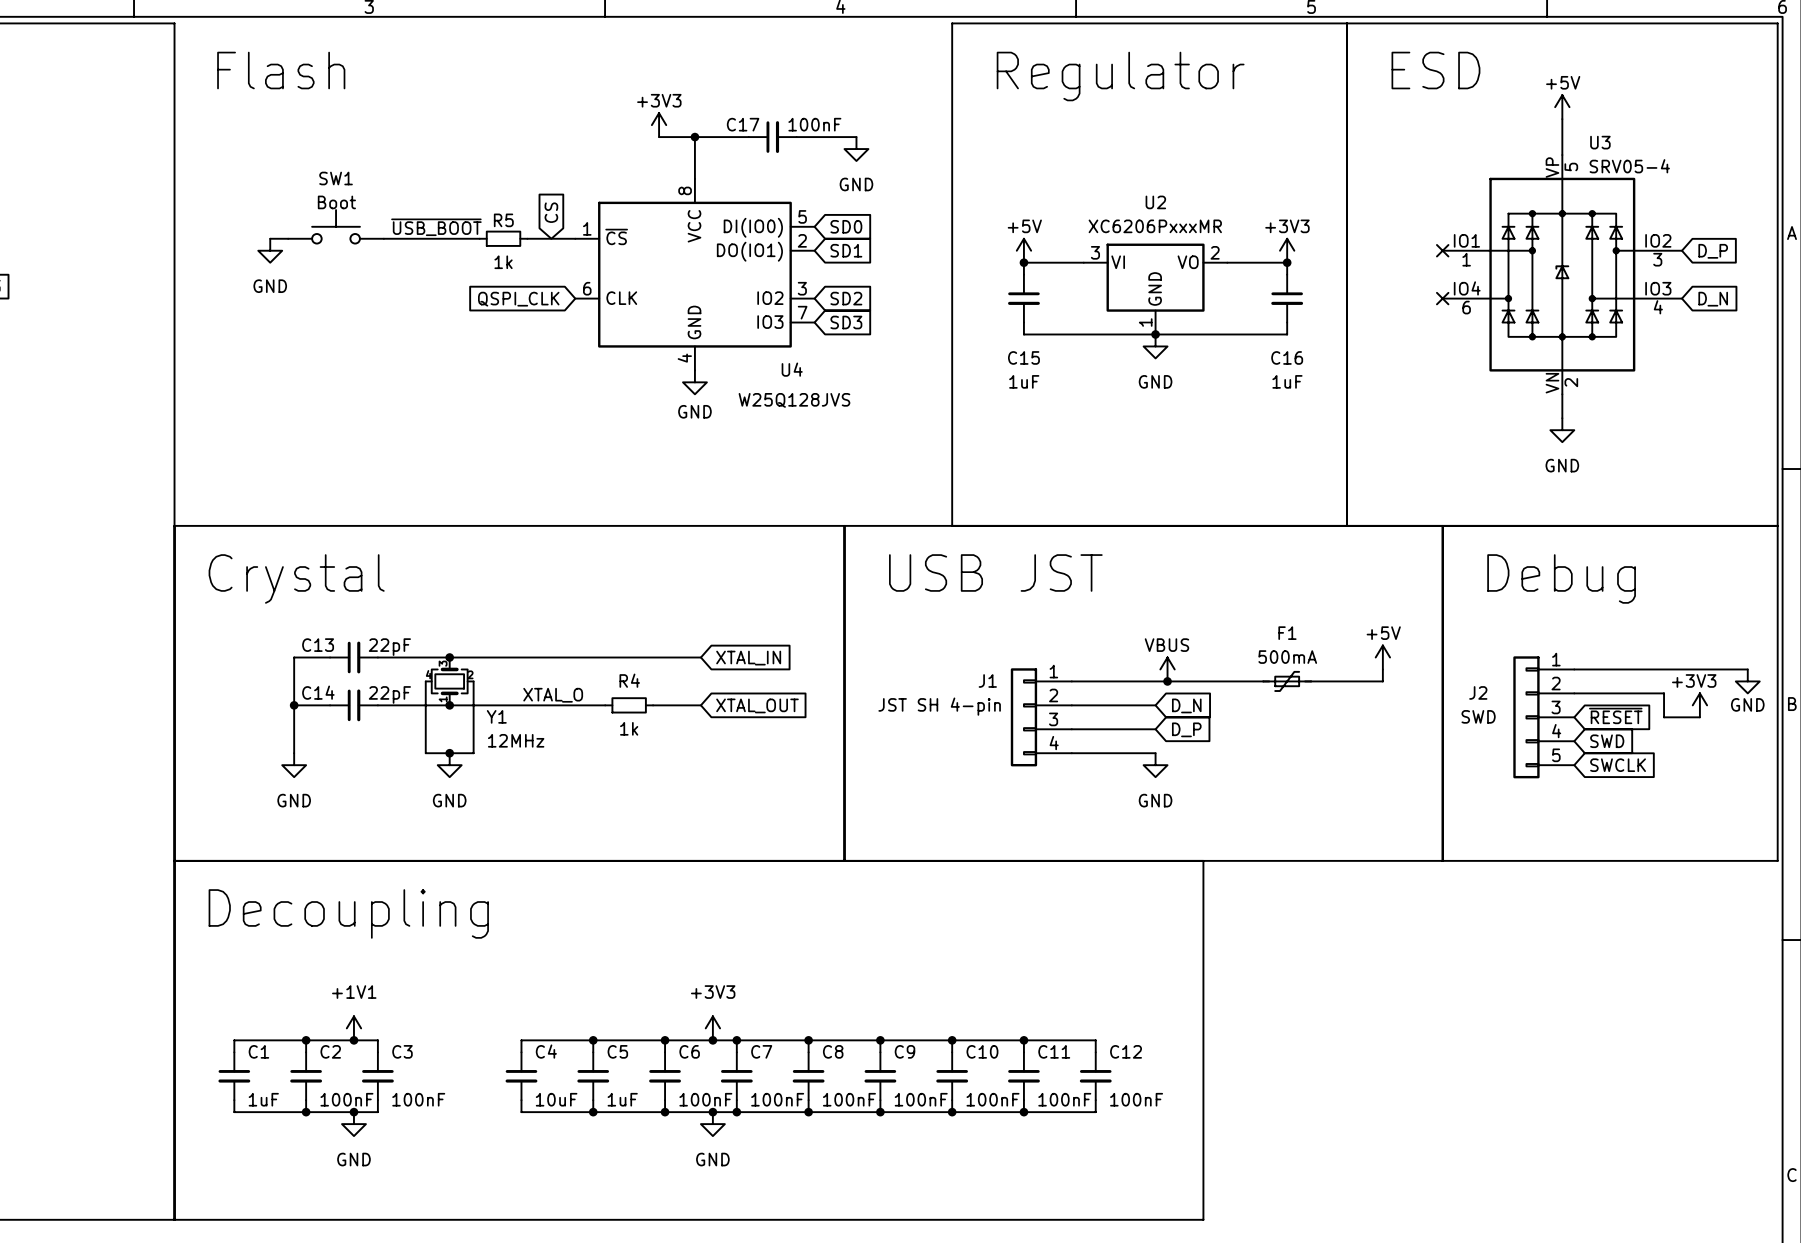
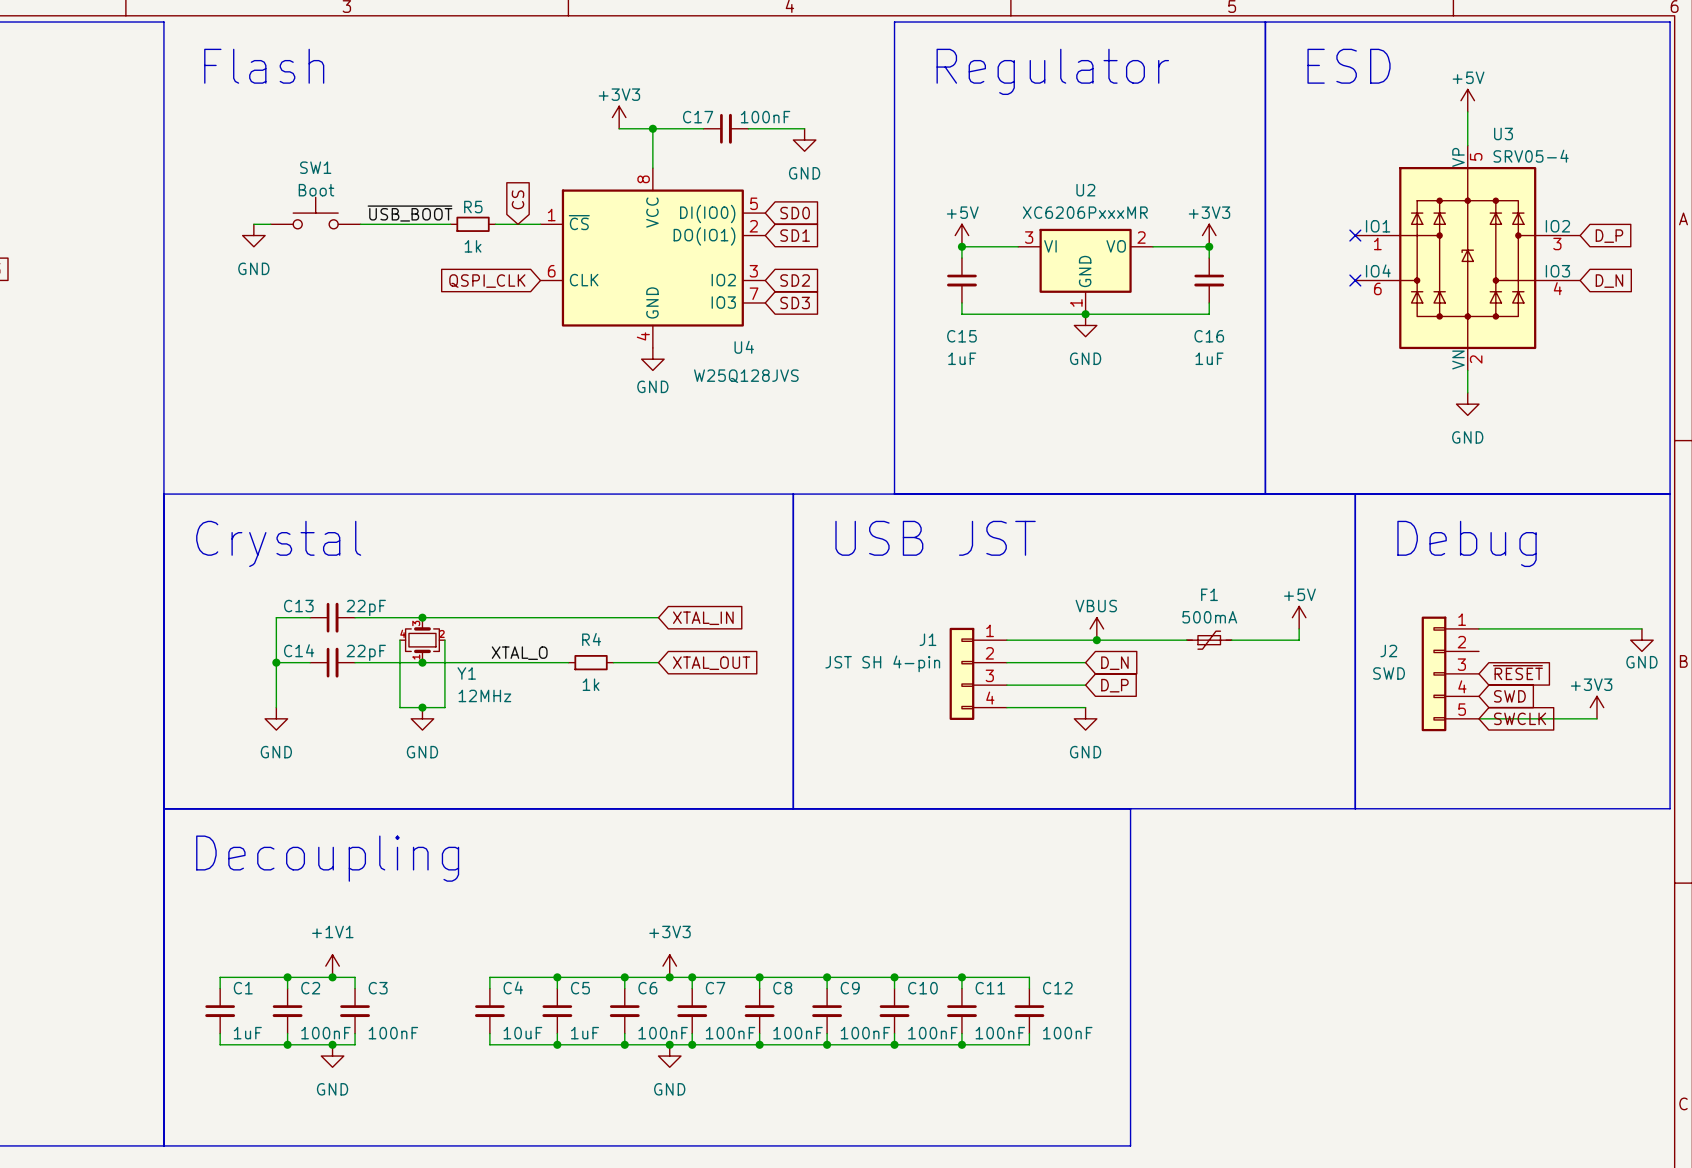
wire: (1574, 693) (1664, 693) (1664, 717) (1699, 717) -> none
power symbol position: +3V3 (1699, 705) -> +3V3 (1596, 707)
wire: none -> (1478, 718) (1596, 718)

